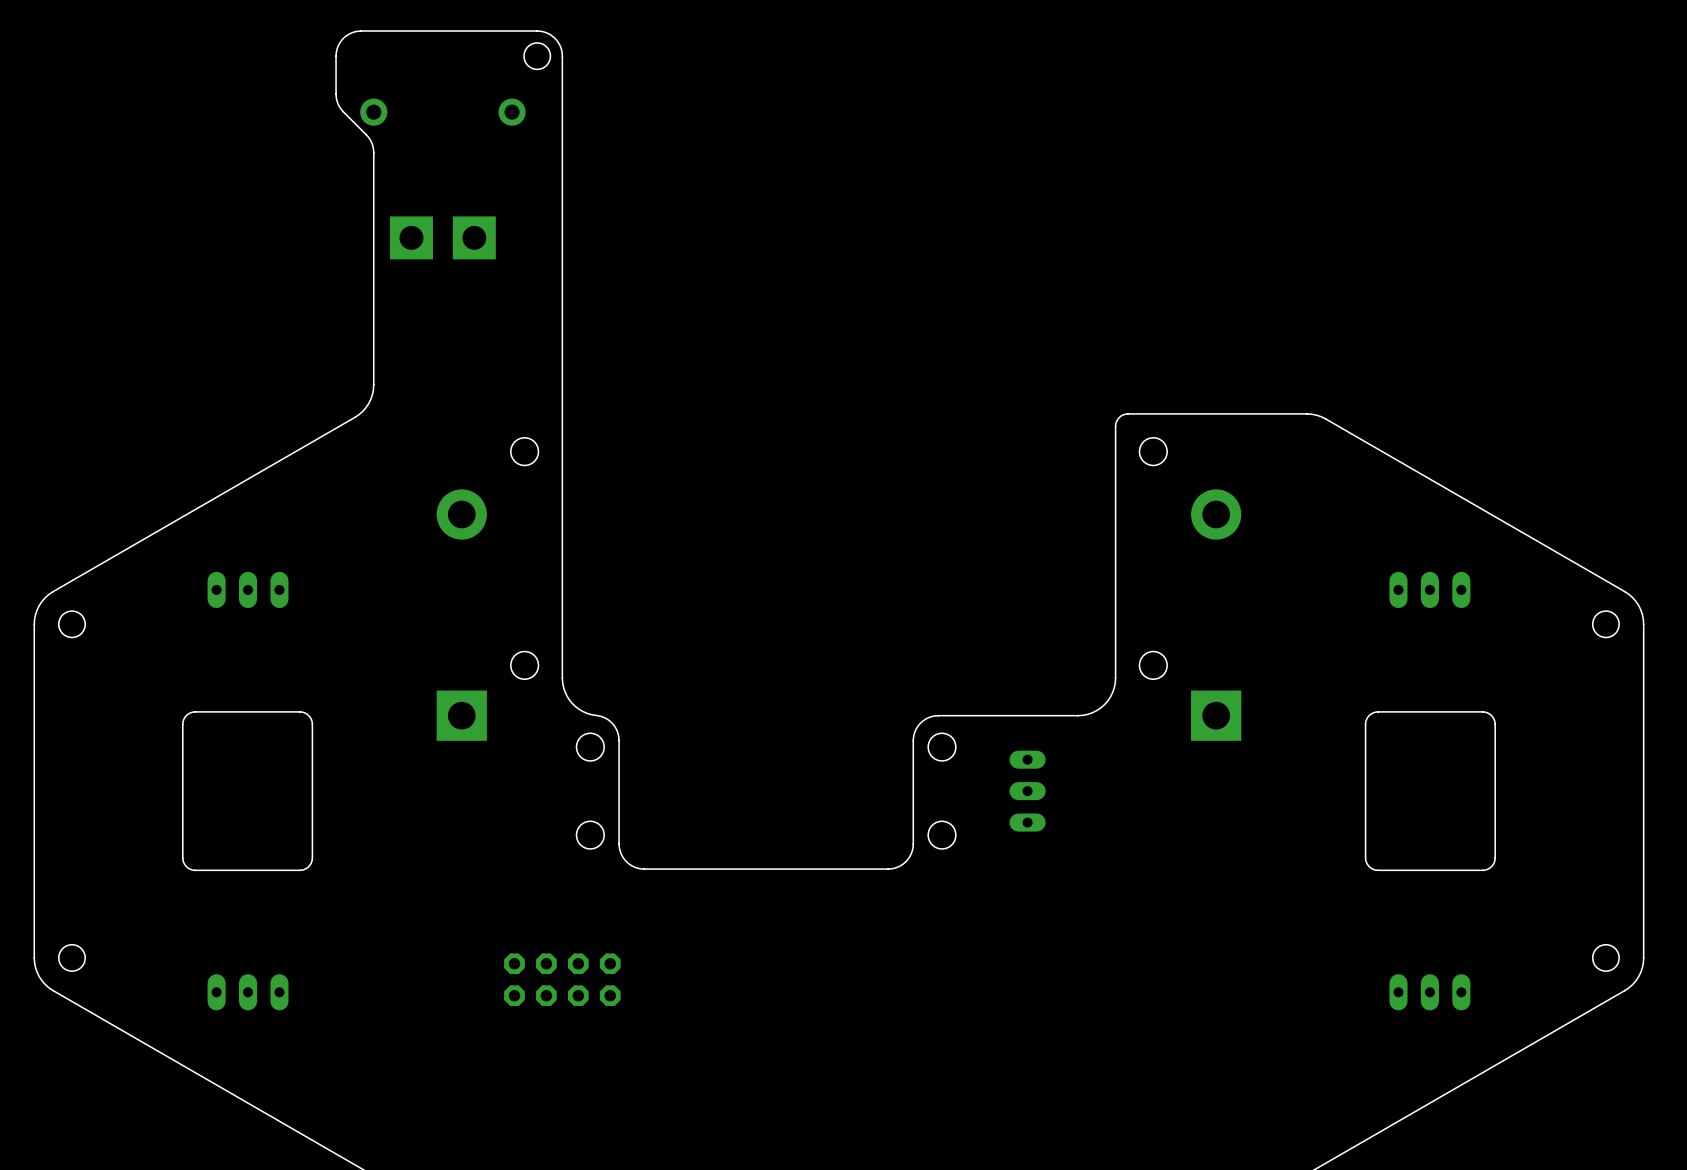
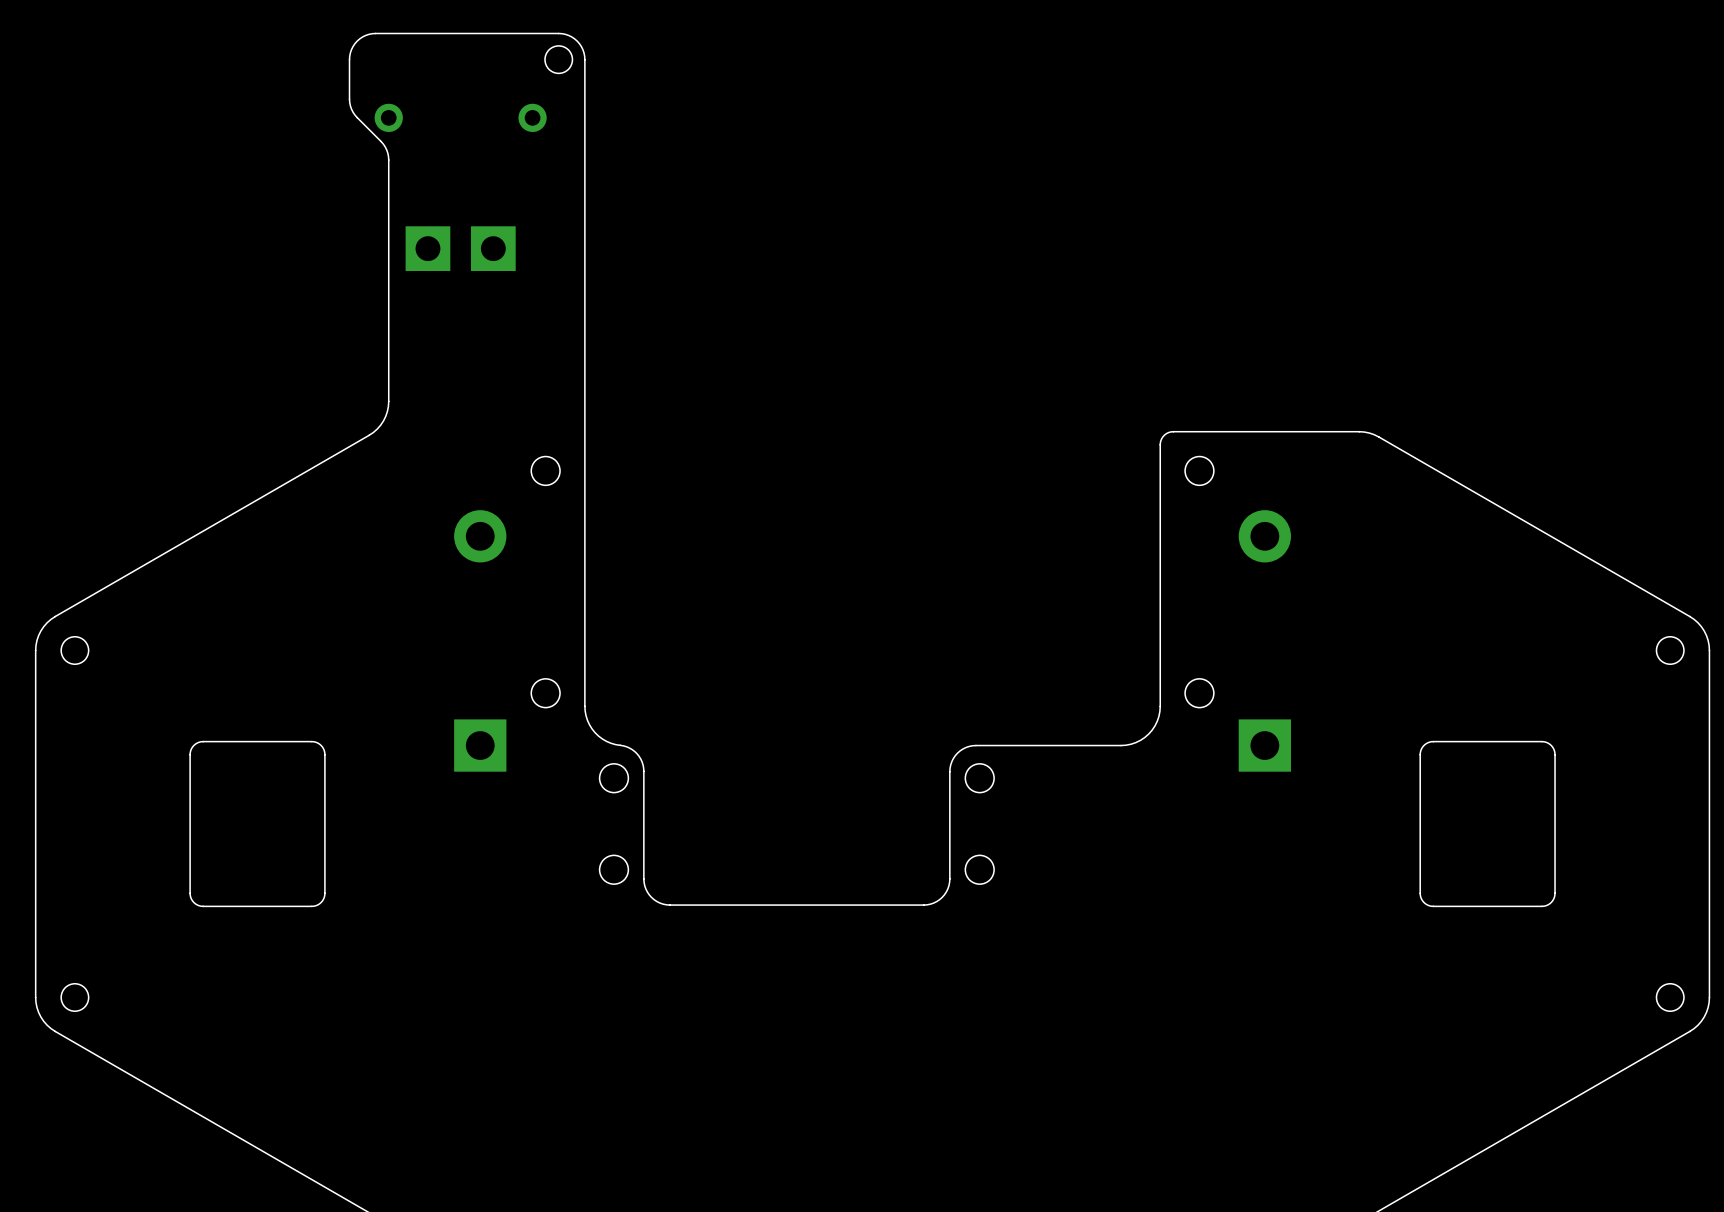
part: (248, 589) -> none
part: (1429, 589) -> none
part: (1027, 791) -> none
part: (562, 979) -> none
part: (248, 992) -> none
part: (1429, 992) -> none

